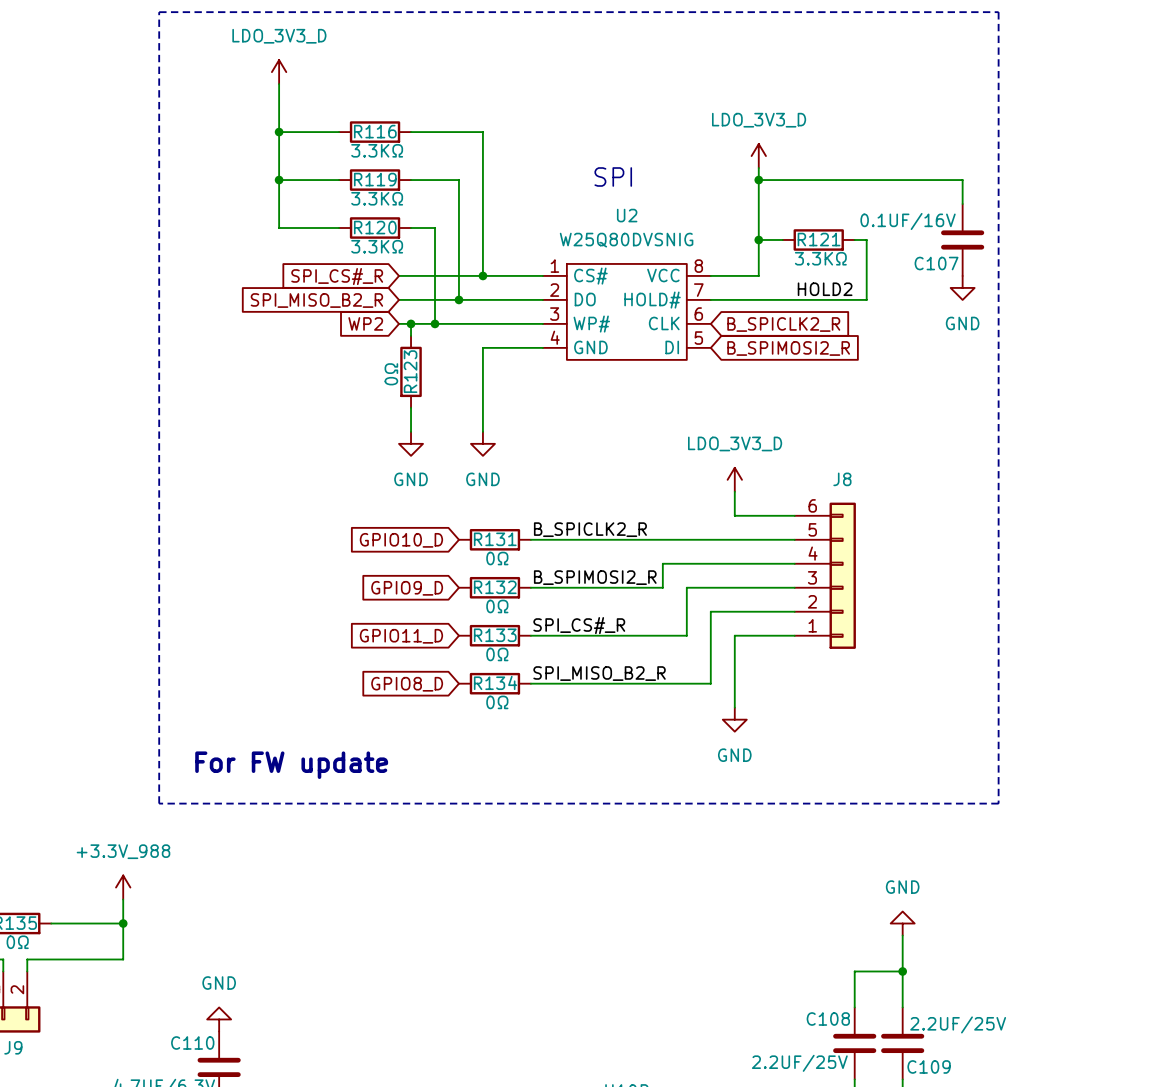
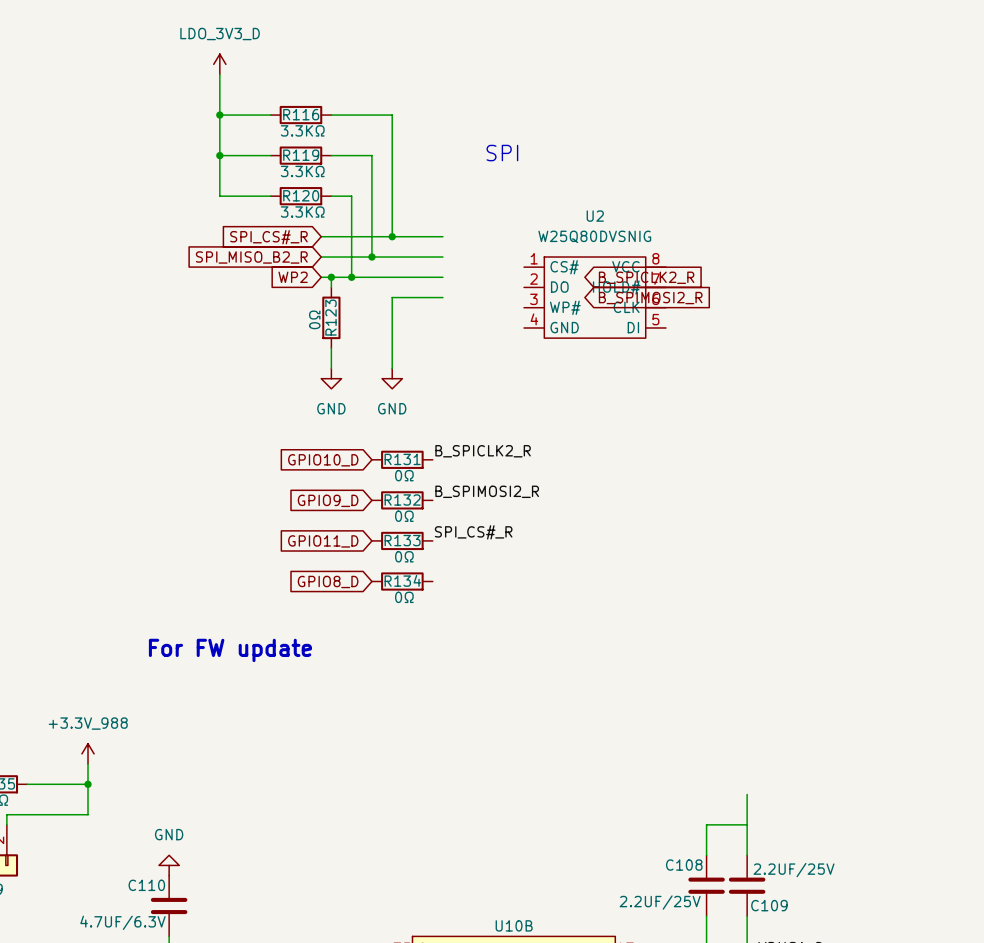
line: (159, 12) (998, 12) (998, 803) (159, 803) (159, 12) -> none
power symbol: LDO_3V3_D (758, 156) -> none
wire: (758, 168) (758, 275) (710, 275) -> none
wire: (758, 180) (962, 180) (962, 204) -> none
junction: (758, 180) -> none
wire: (758, 239) (782, 239) -> none
junction: (758, 239) -> none
R121: 3.3KΩ (818, 239) -> none
wire: (854, 239) (866, 239) (866, 299) (710, 299) -> none
C107: 0.1UF/16V (962, 239) -> none
power symbol: GND (962, 287) -> none
label: HOLD2 (825, 289) -> none
U2 position: (626, 311) -> (595, 297)
power symbol: LDO_3V3_D (734, 479) -> none
wire: (734, 491) (734, 515) (794, 515) -> none
wire: (530, 539) (794, 539) -> none
wire: (794, 563) (662, 563) (662, 587) (530, 587) -> none
J8: (825, 575) -> none
wire: (794, 587) (686, 587) (686, 635) (530, 635) -> none
wire: (794, 611) (710, 611) (710, 683) (530, 683) -> none
wire: (794, 635) (734, 635) (734, 707) -> none
label: SPI_MISO_B2_R (599, 673) -> none
power symbol: GND (734, 719) -> none
power symbol: GND (902, 923) -> none
junction: (902, 971) -> none

